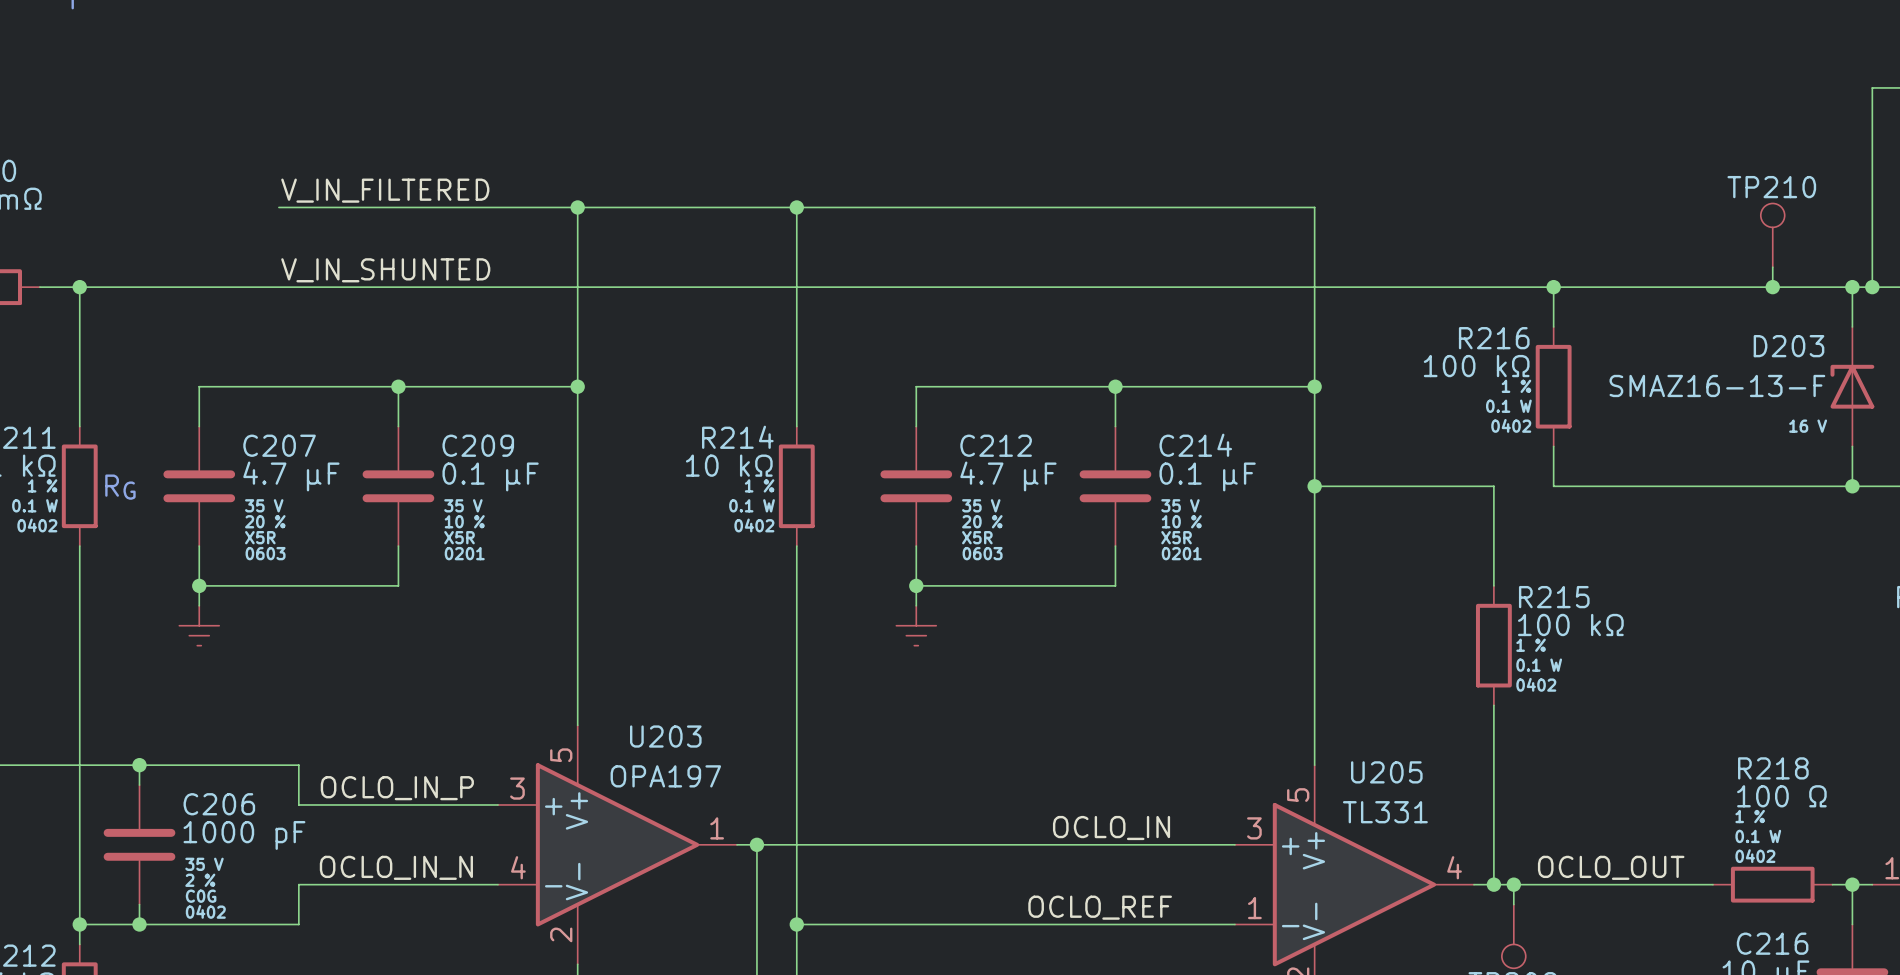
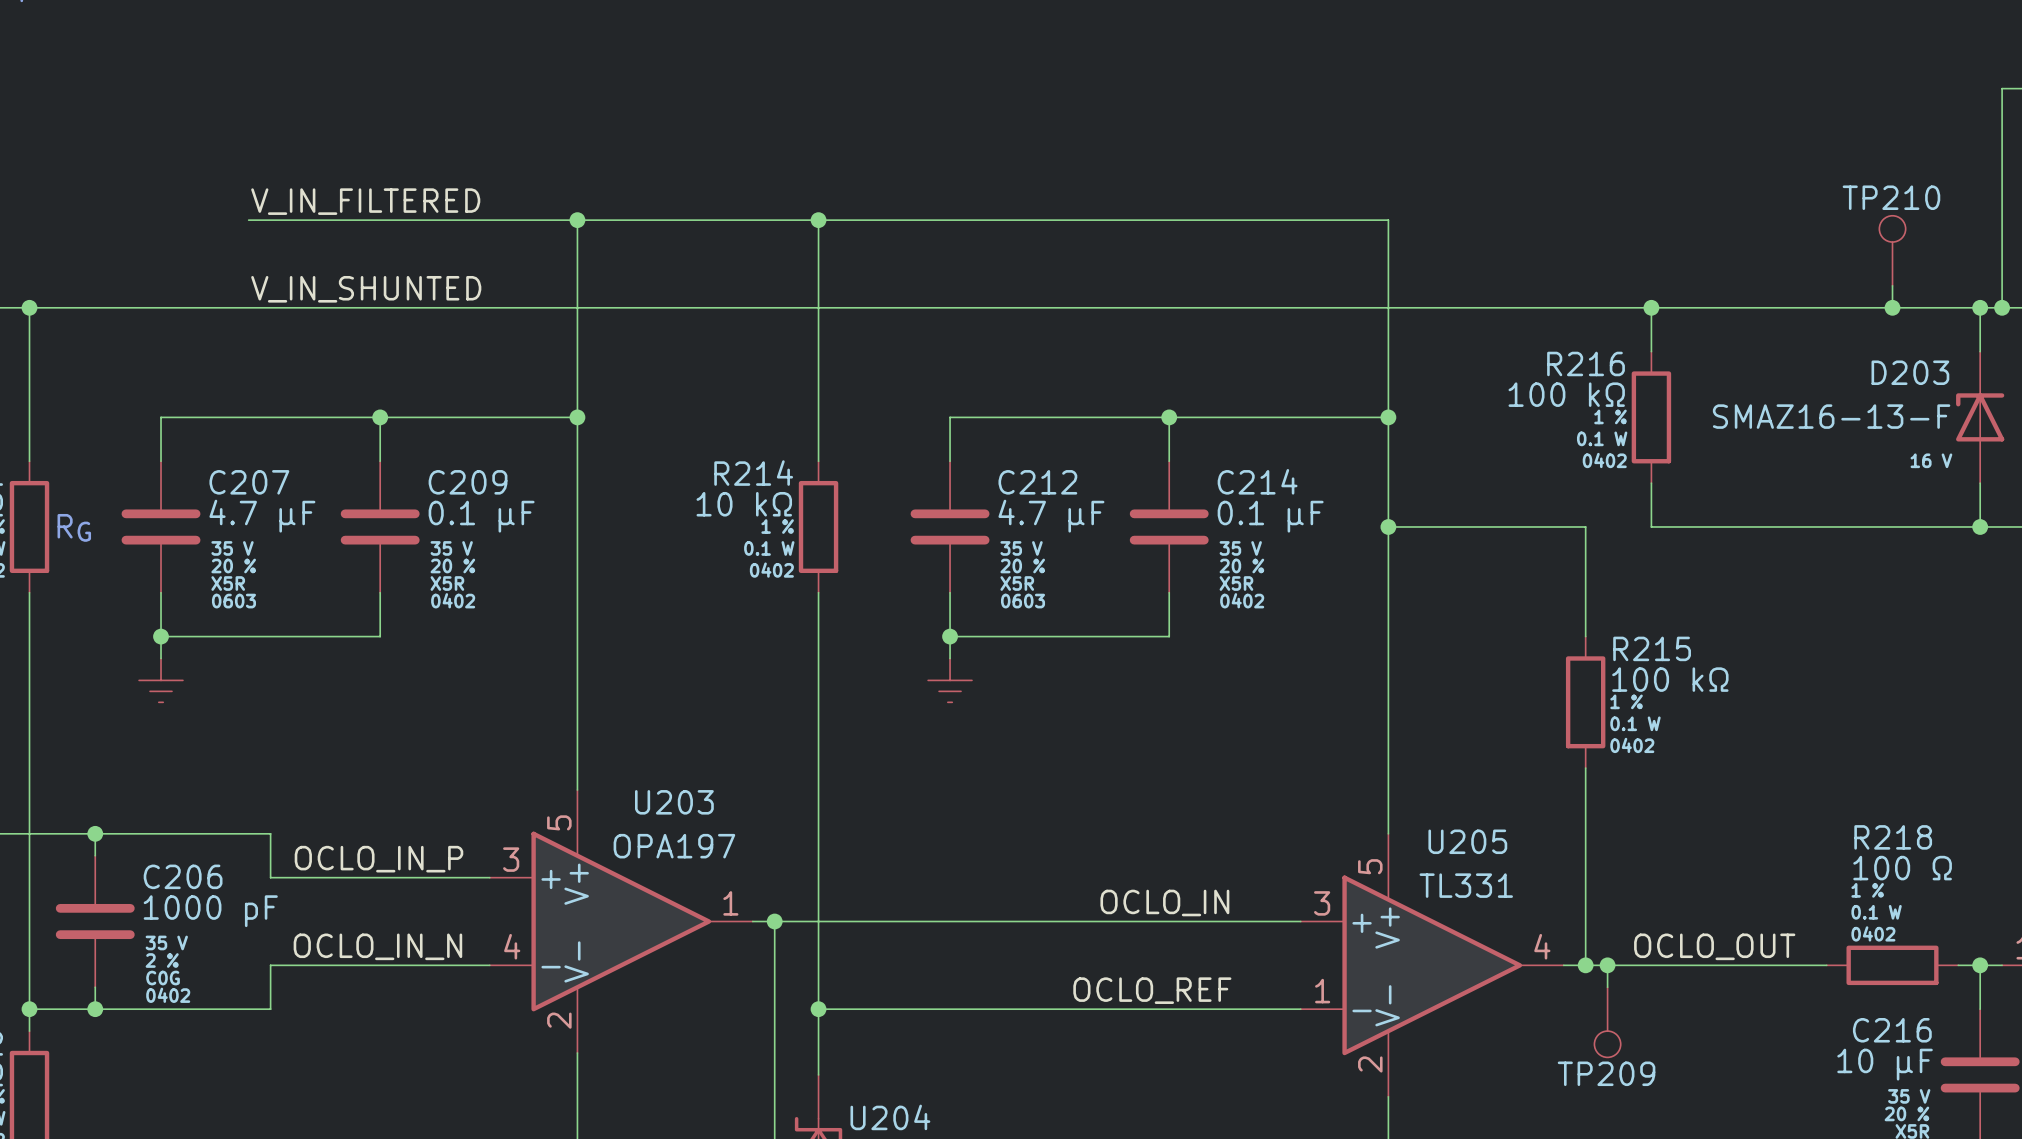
C209 text: 10 % (464, 521) -> 20 % (452, 565)
C214 text: 10 % (1181, 521) -> 20 % (1241, 565)
C209 text: 0201 (464, 553) -> 0402 (453, 600)
C214 text: 0201 (1181, 553) -> 0402 (1242, 600)

